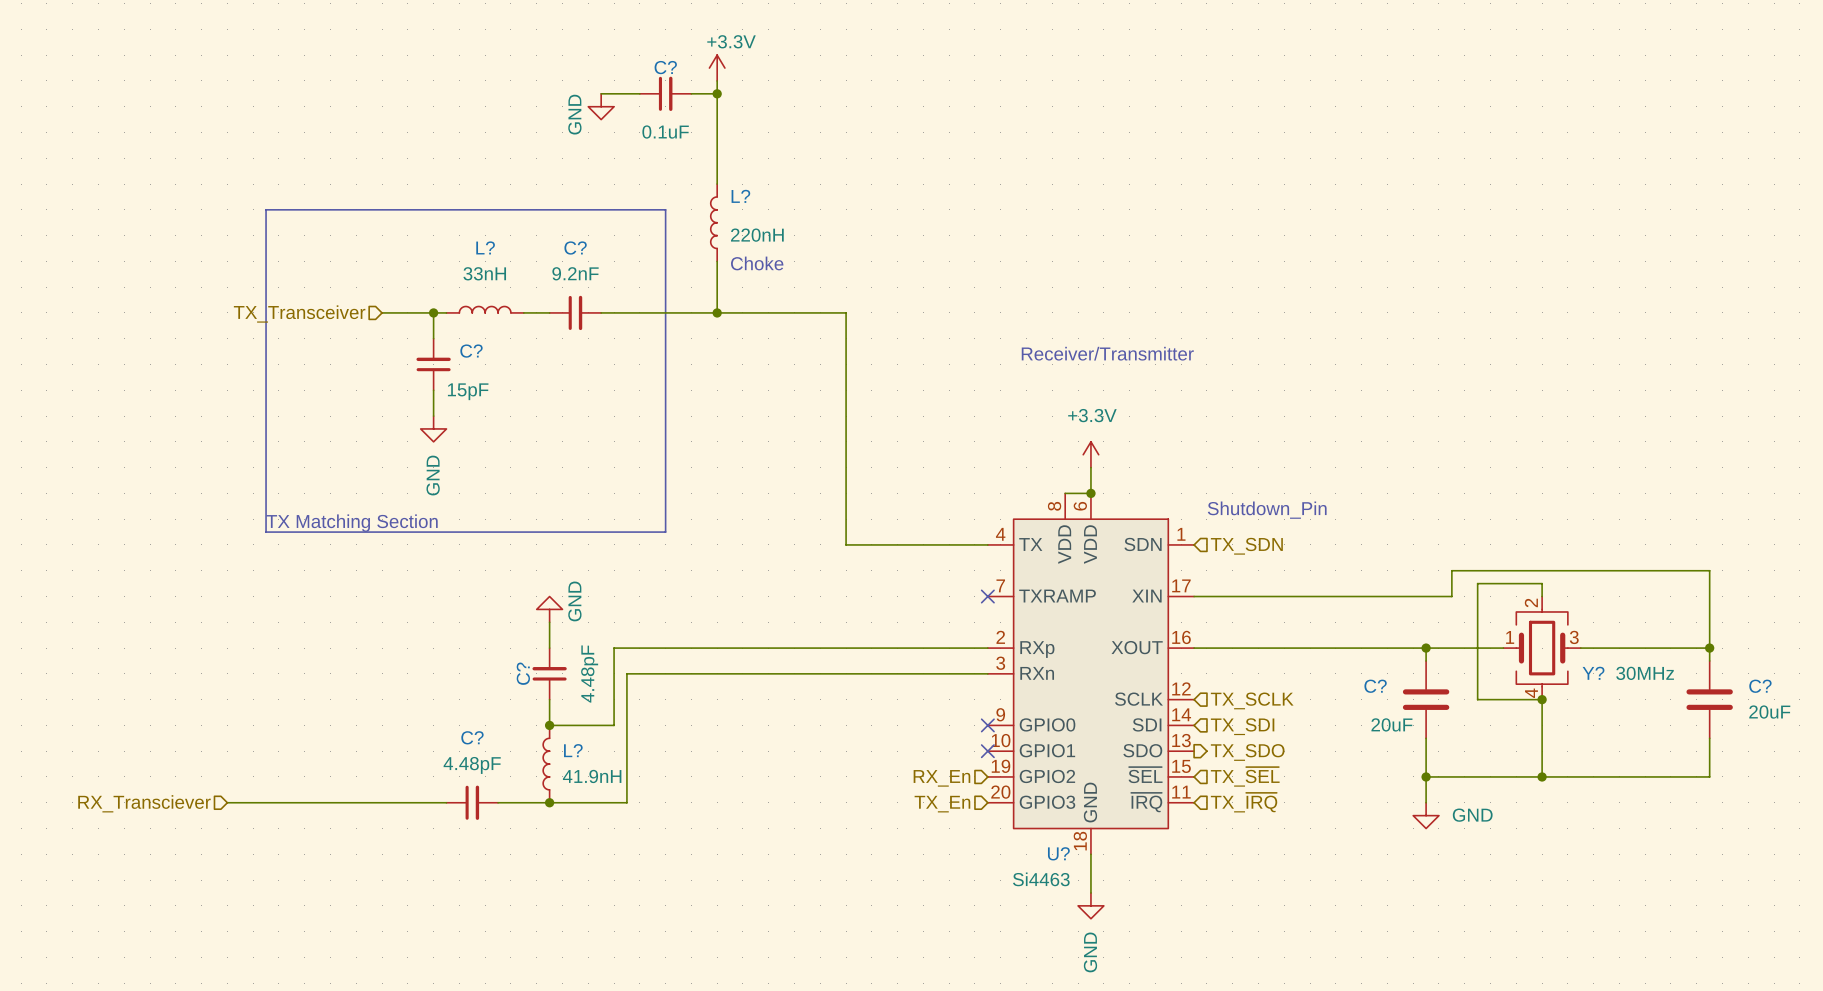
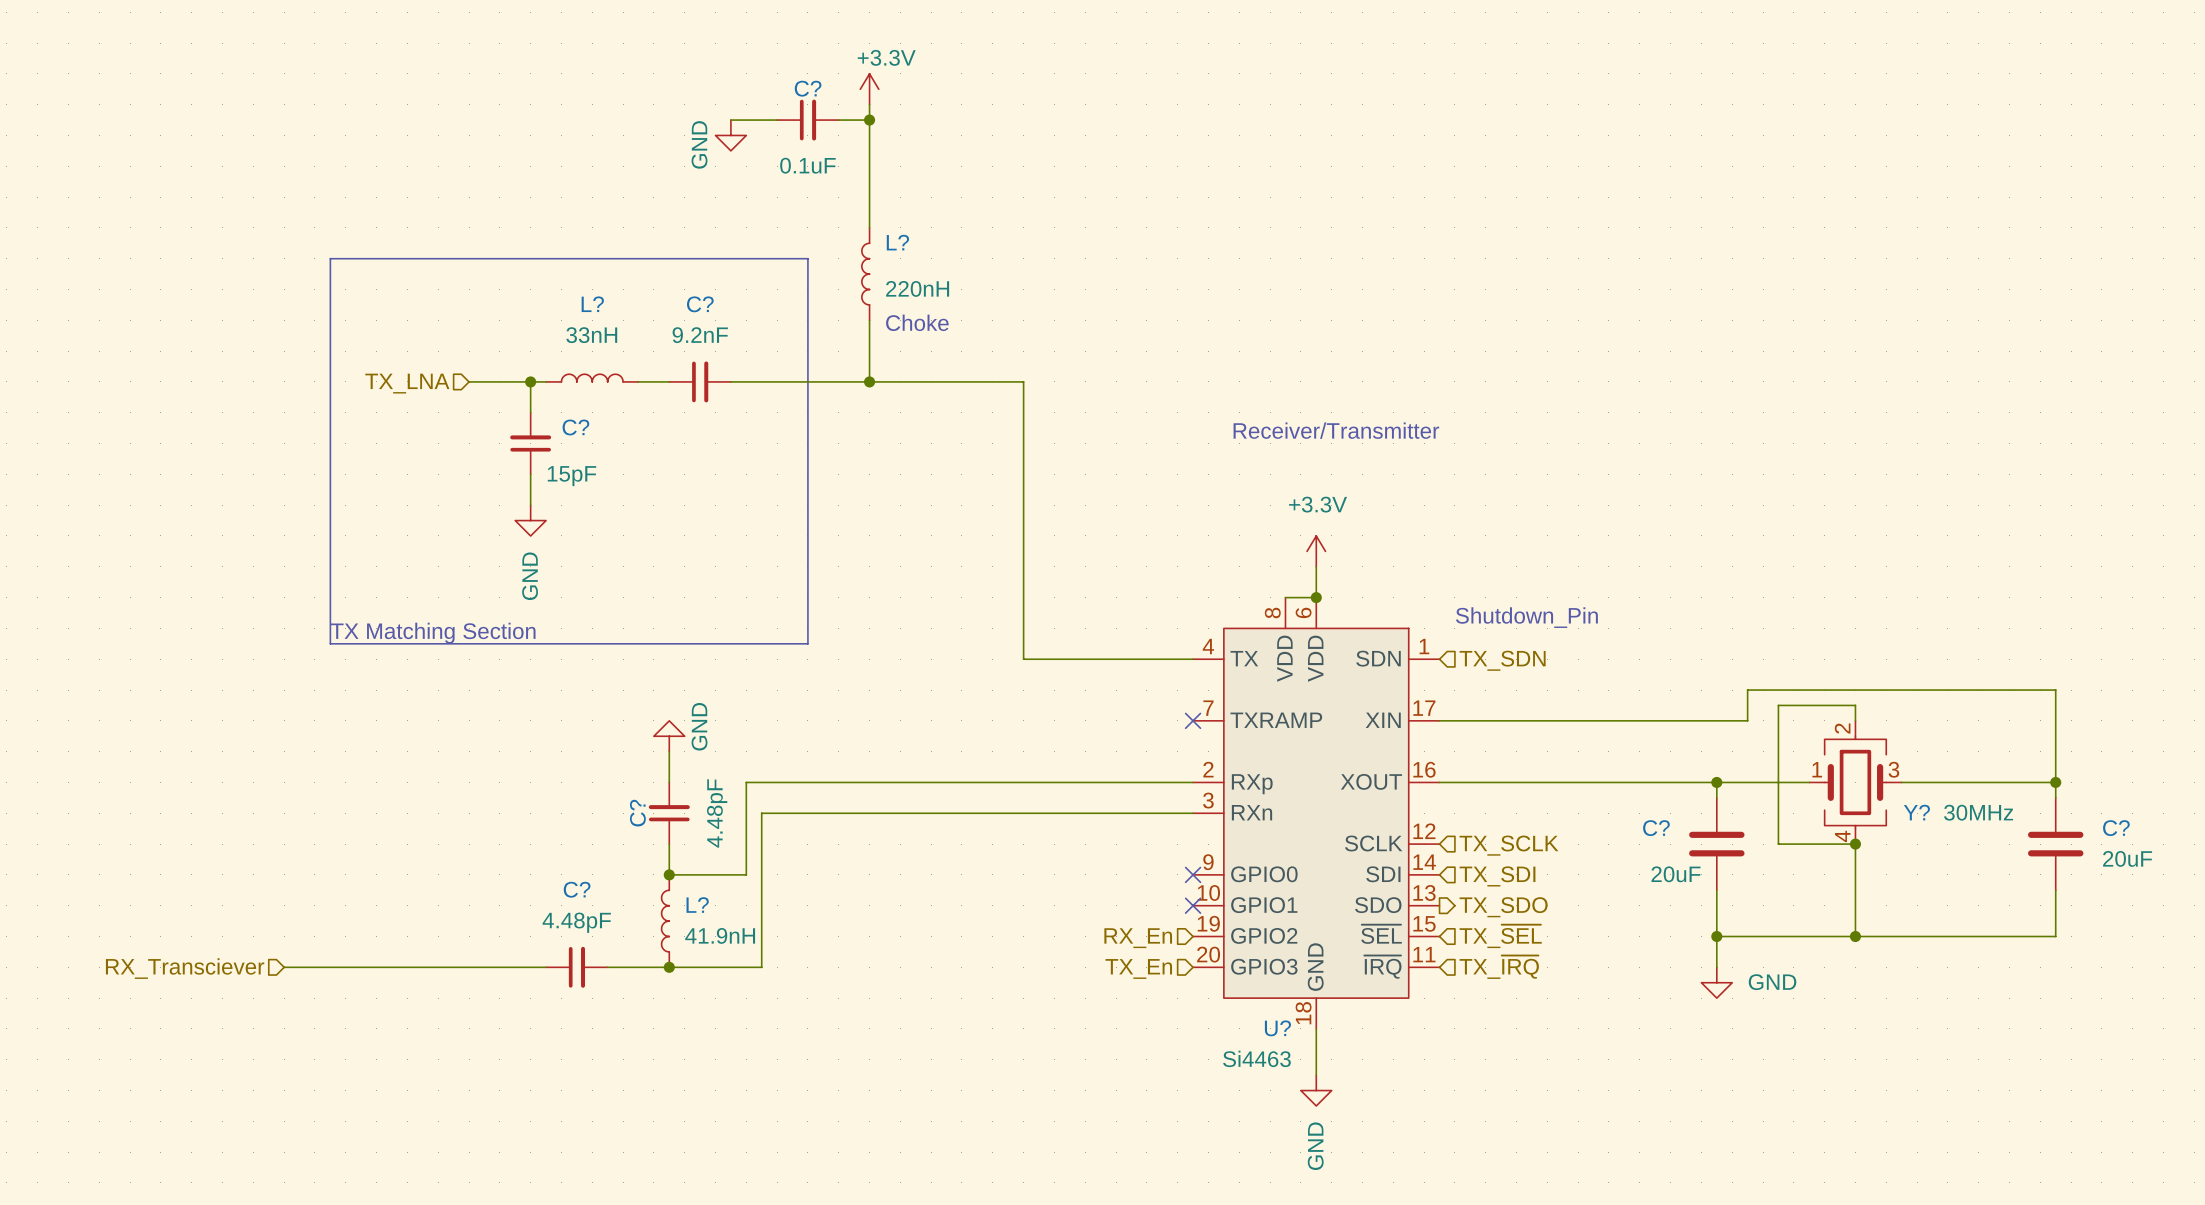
hierarchical label: TX_Transceiver (299, 313) -> TX_LNA (407, 383)

